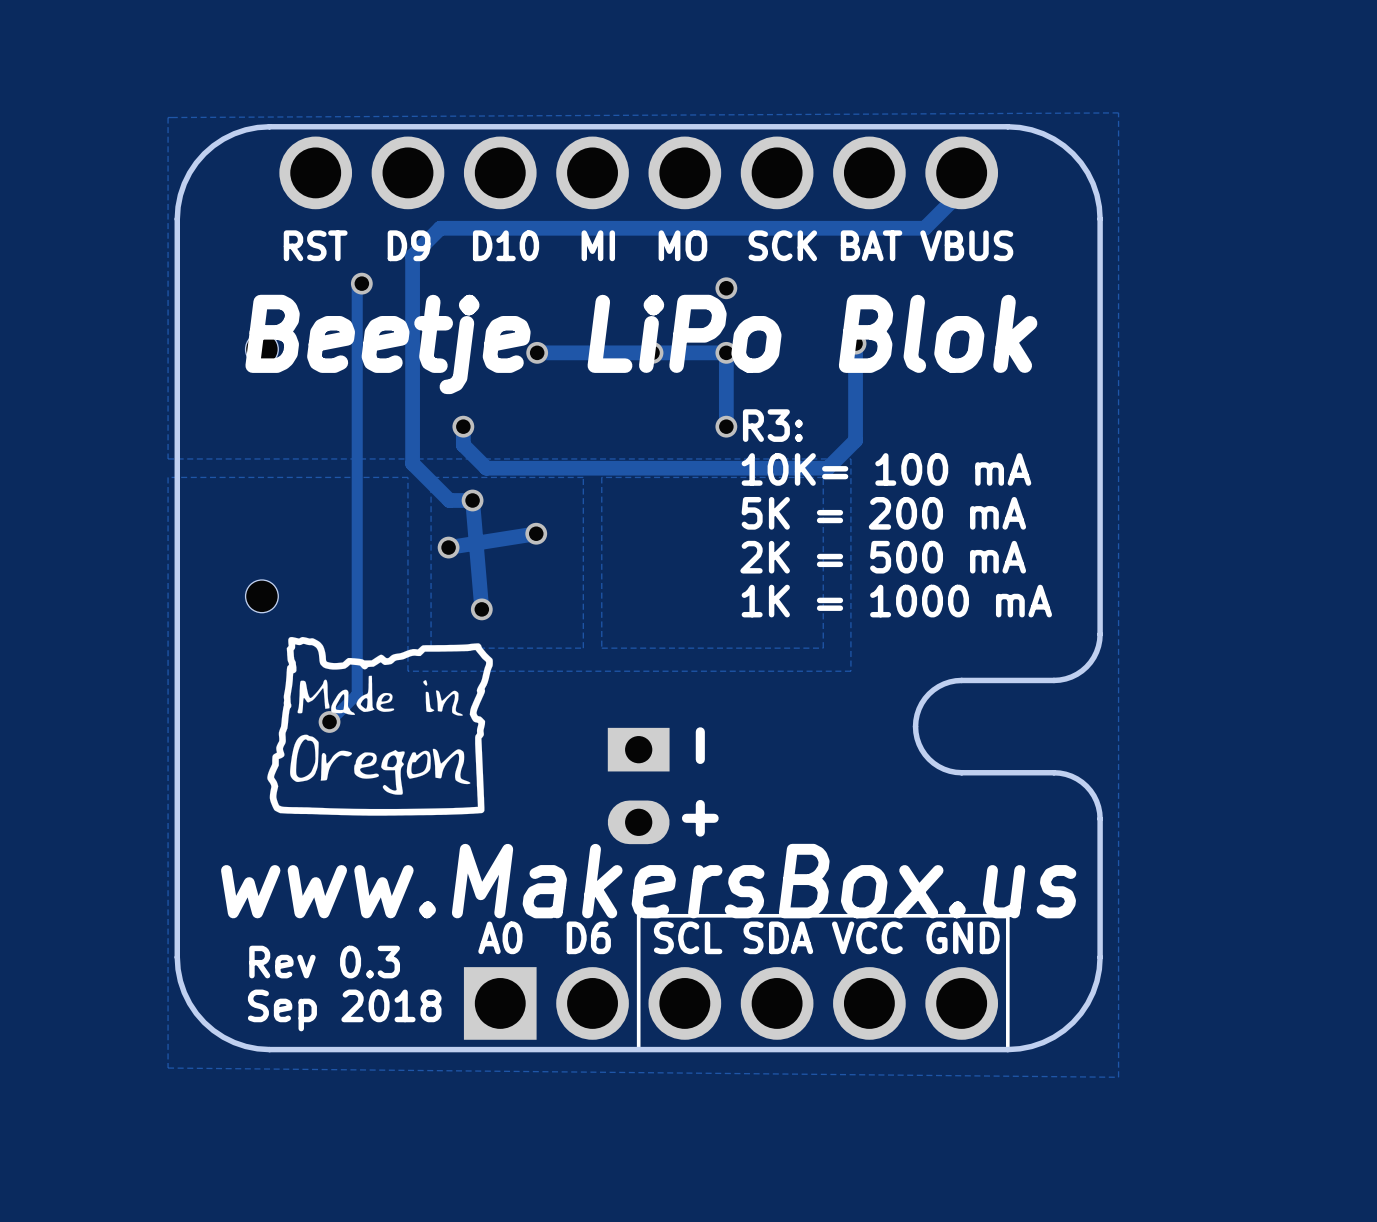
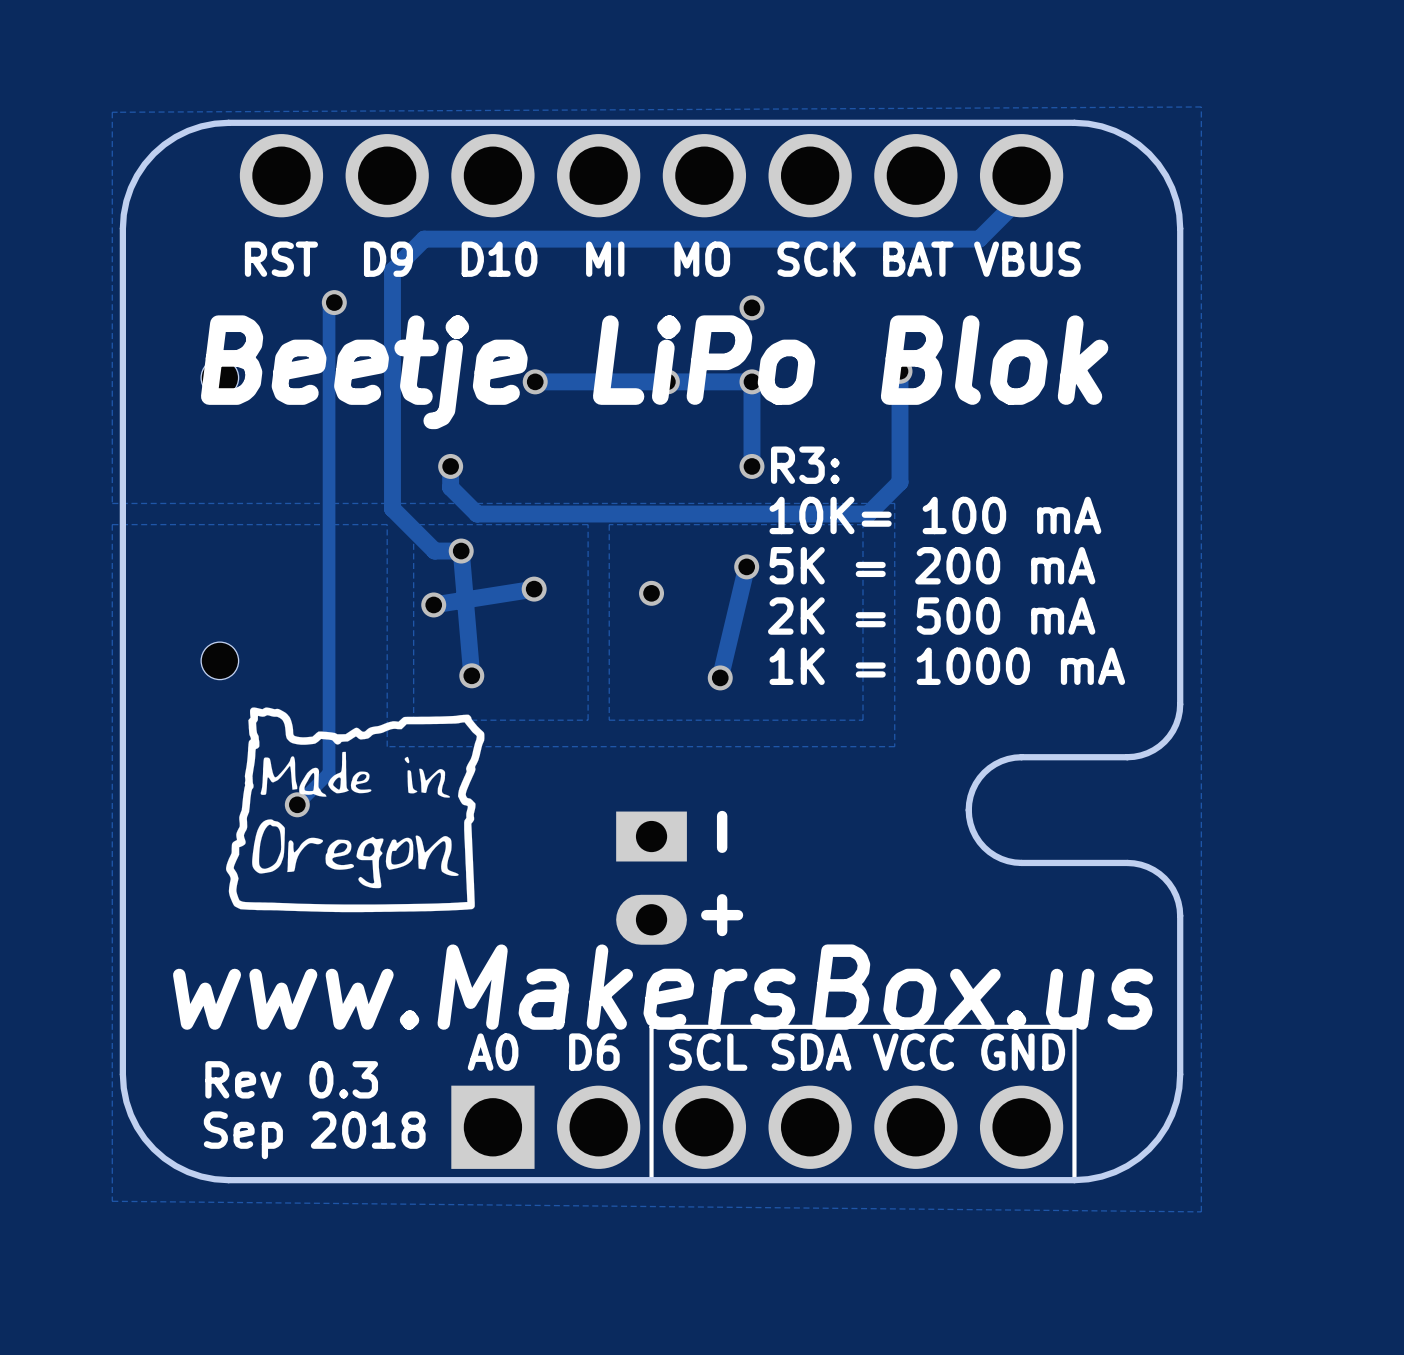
track: none -> (746, 566) (720, 677)
via: none -> (746, 566)
via: none -> (651, 593)
via: none -> (720, 677)

